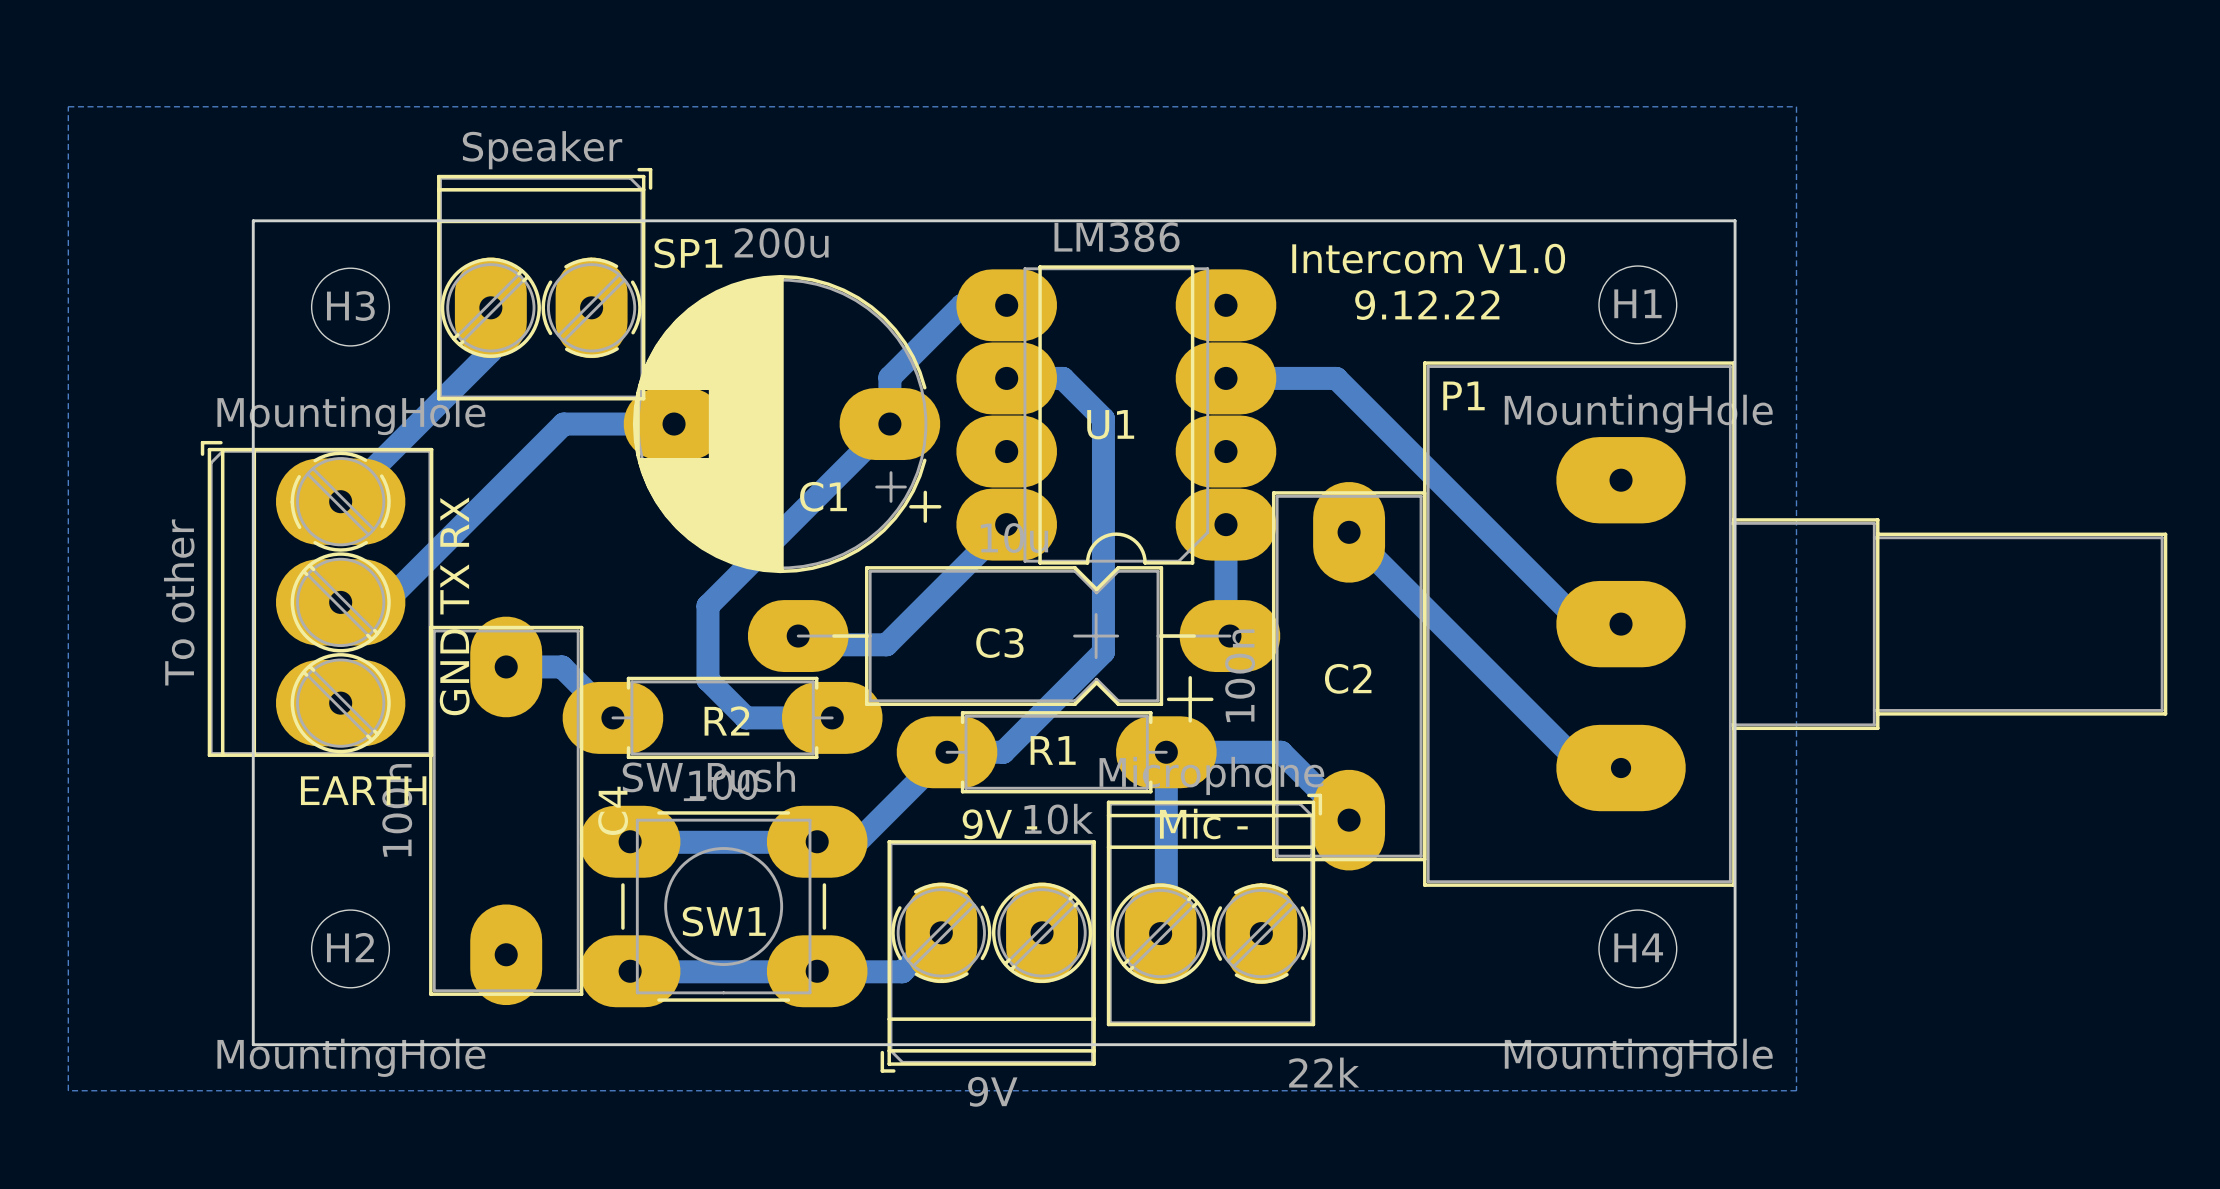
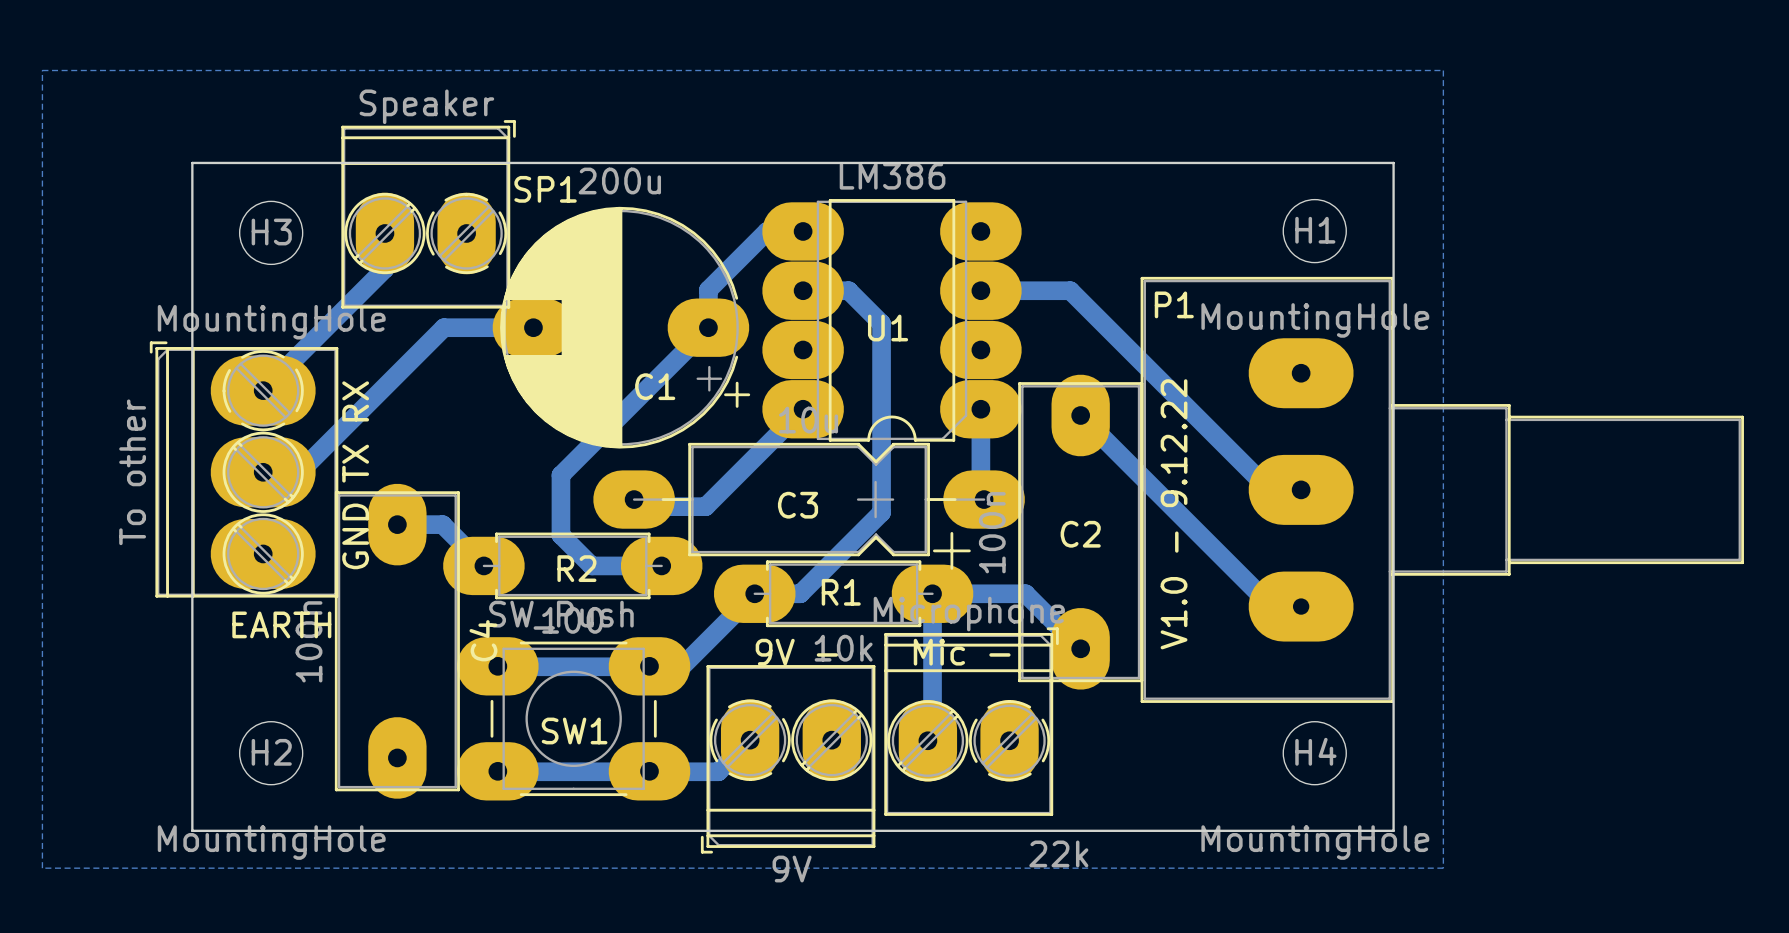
text: Intercom V1.0 (1428, 258) -> none
text: 9.12.22 (1427, 305) -> none
text: none -> V1.0 - 9.12.22 (1174, 514)

